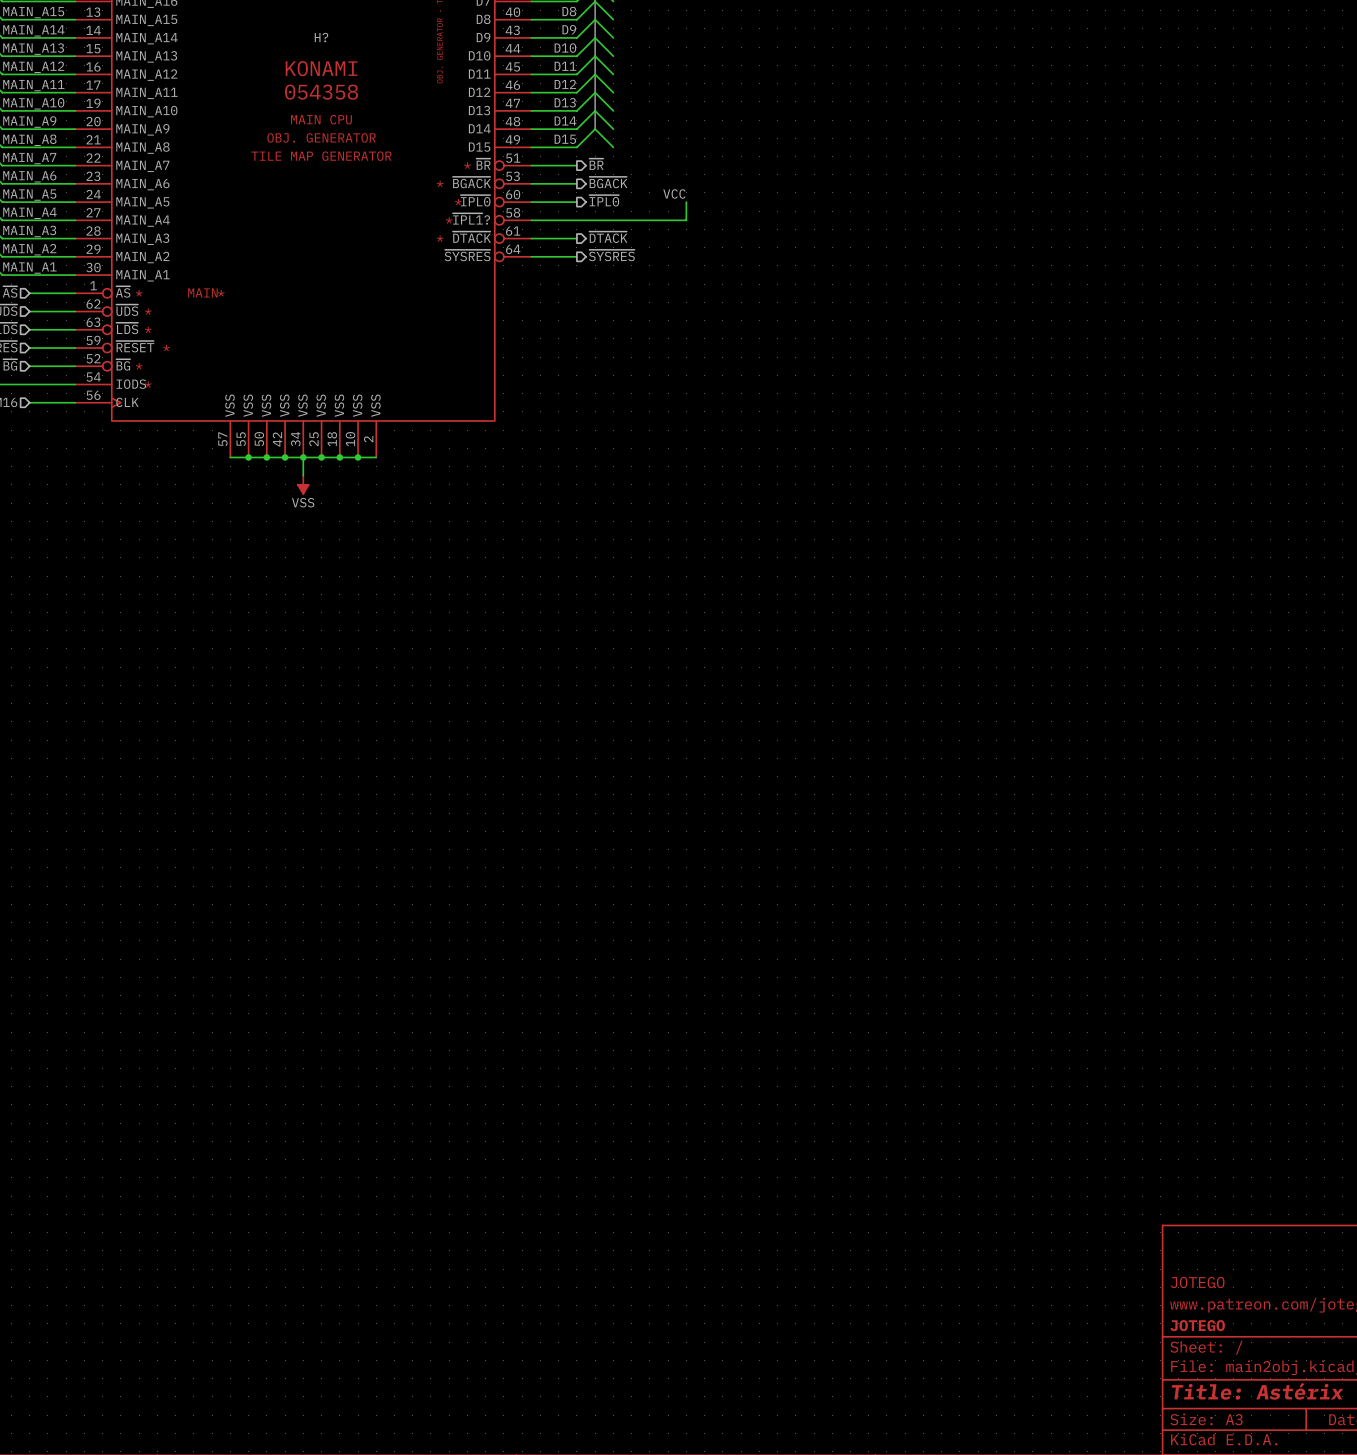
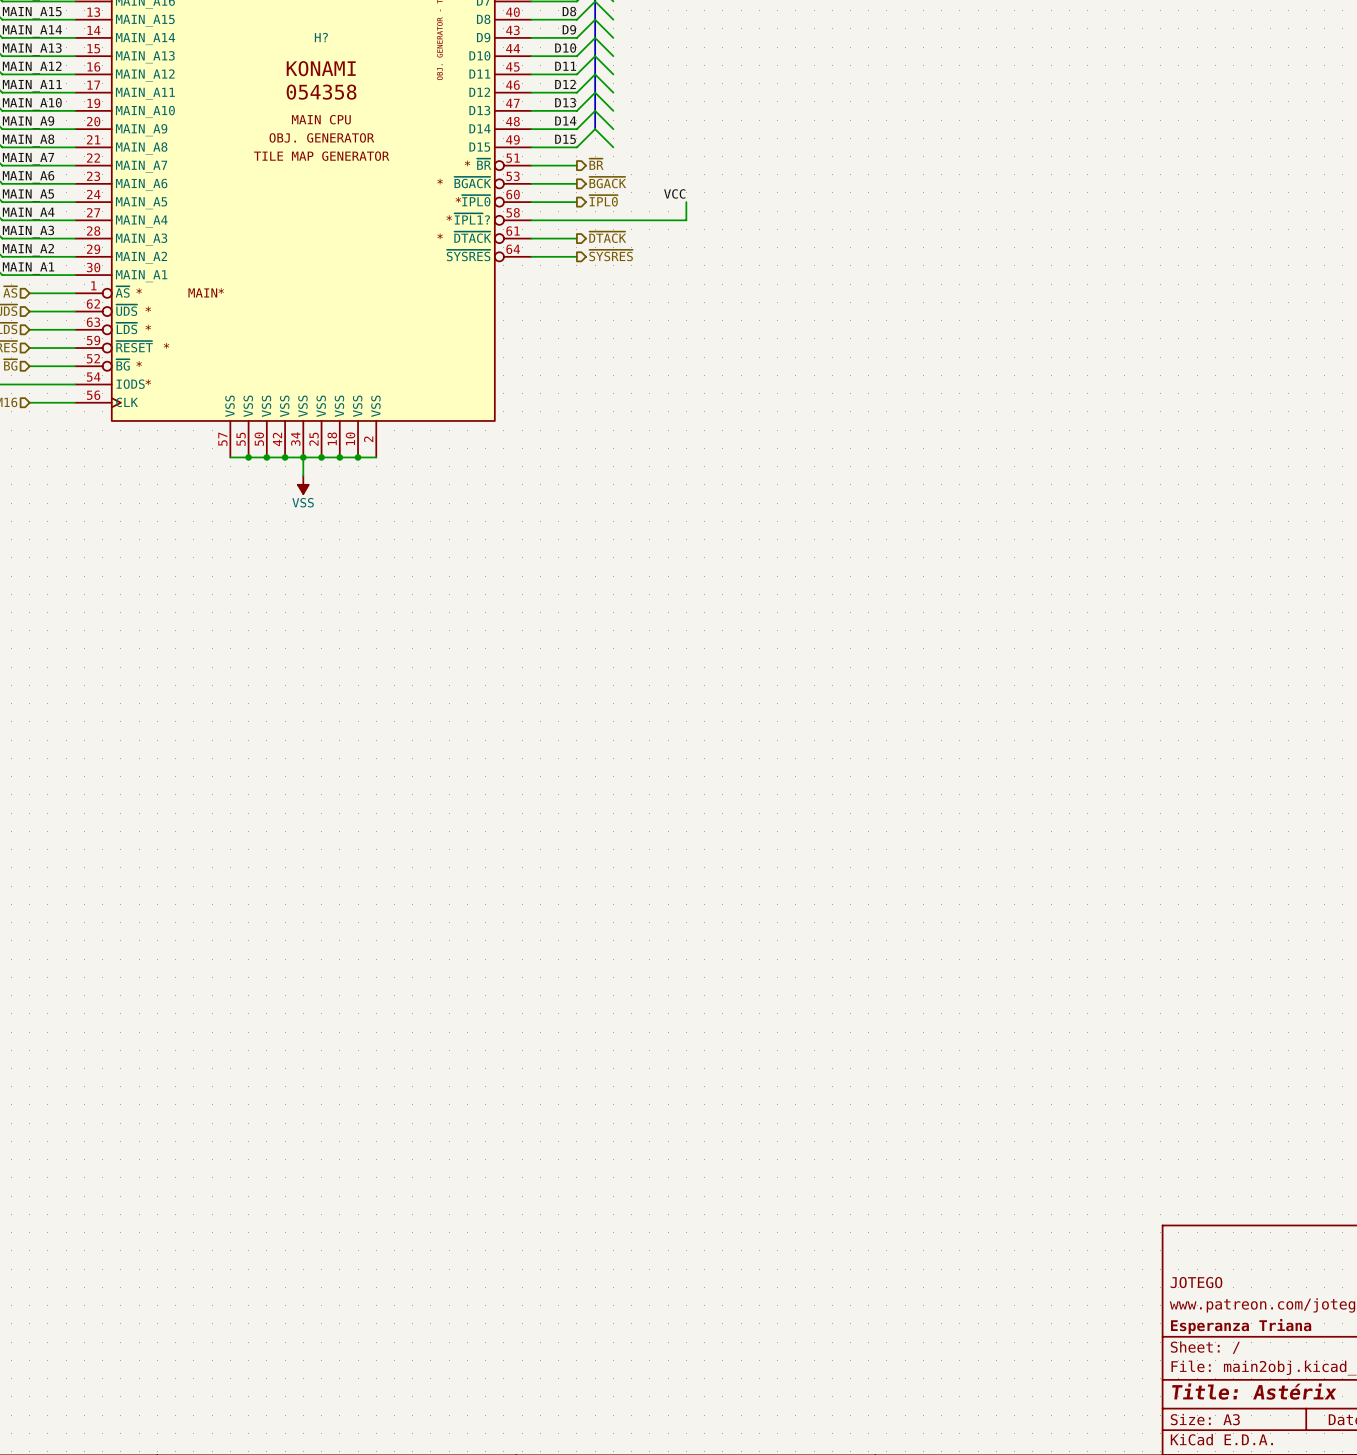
title block: JOTEGO (1197, 1325) -> Esperanza Triana (1241, 1326)

